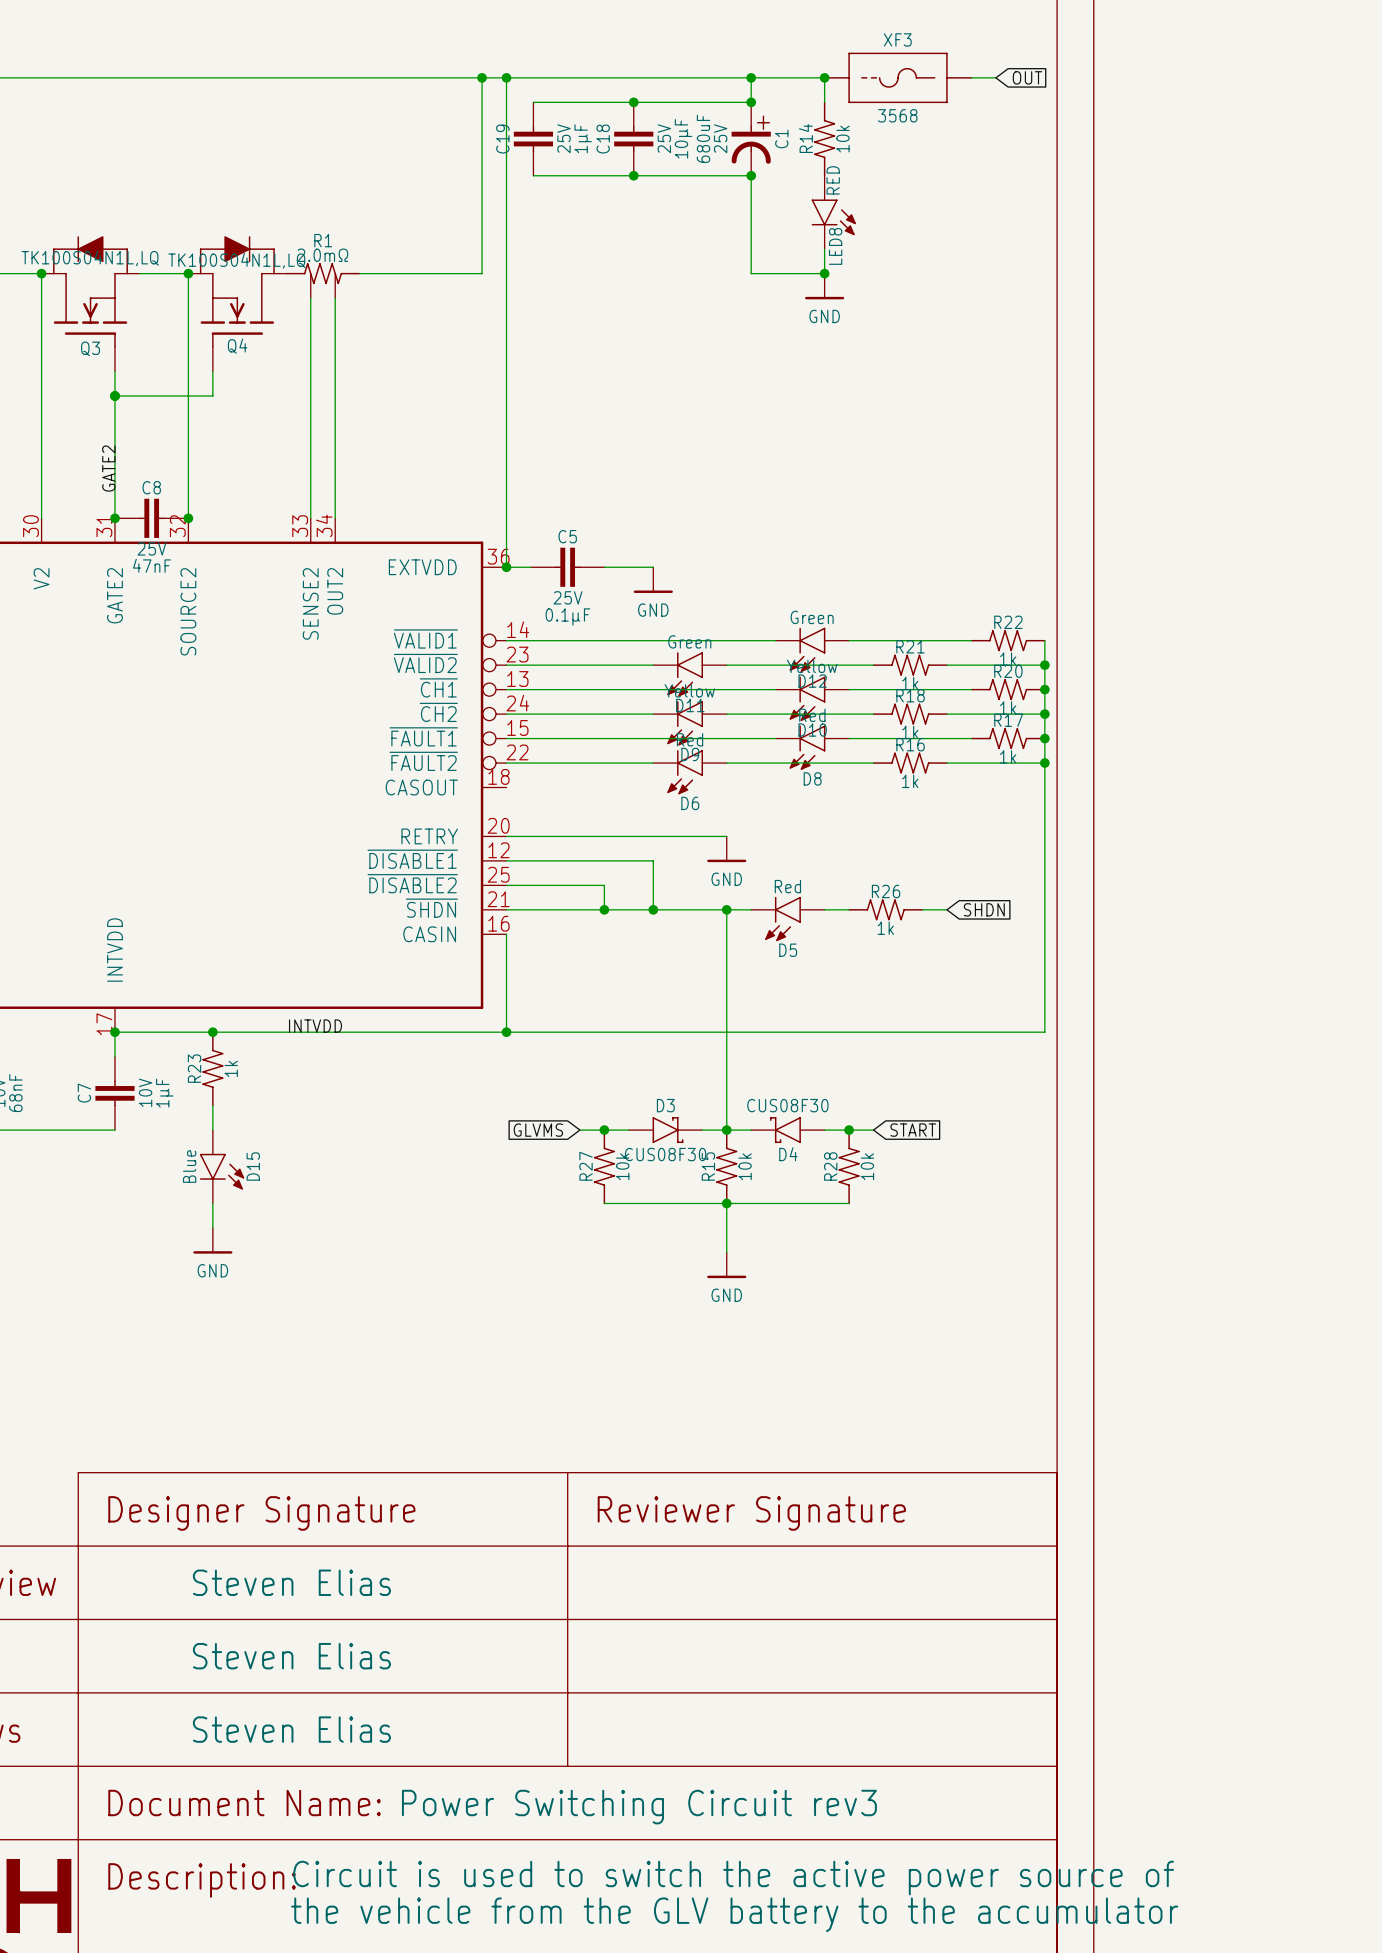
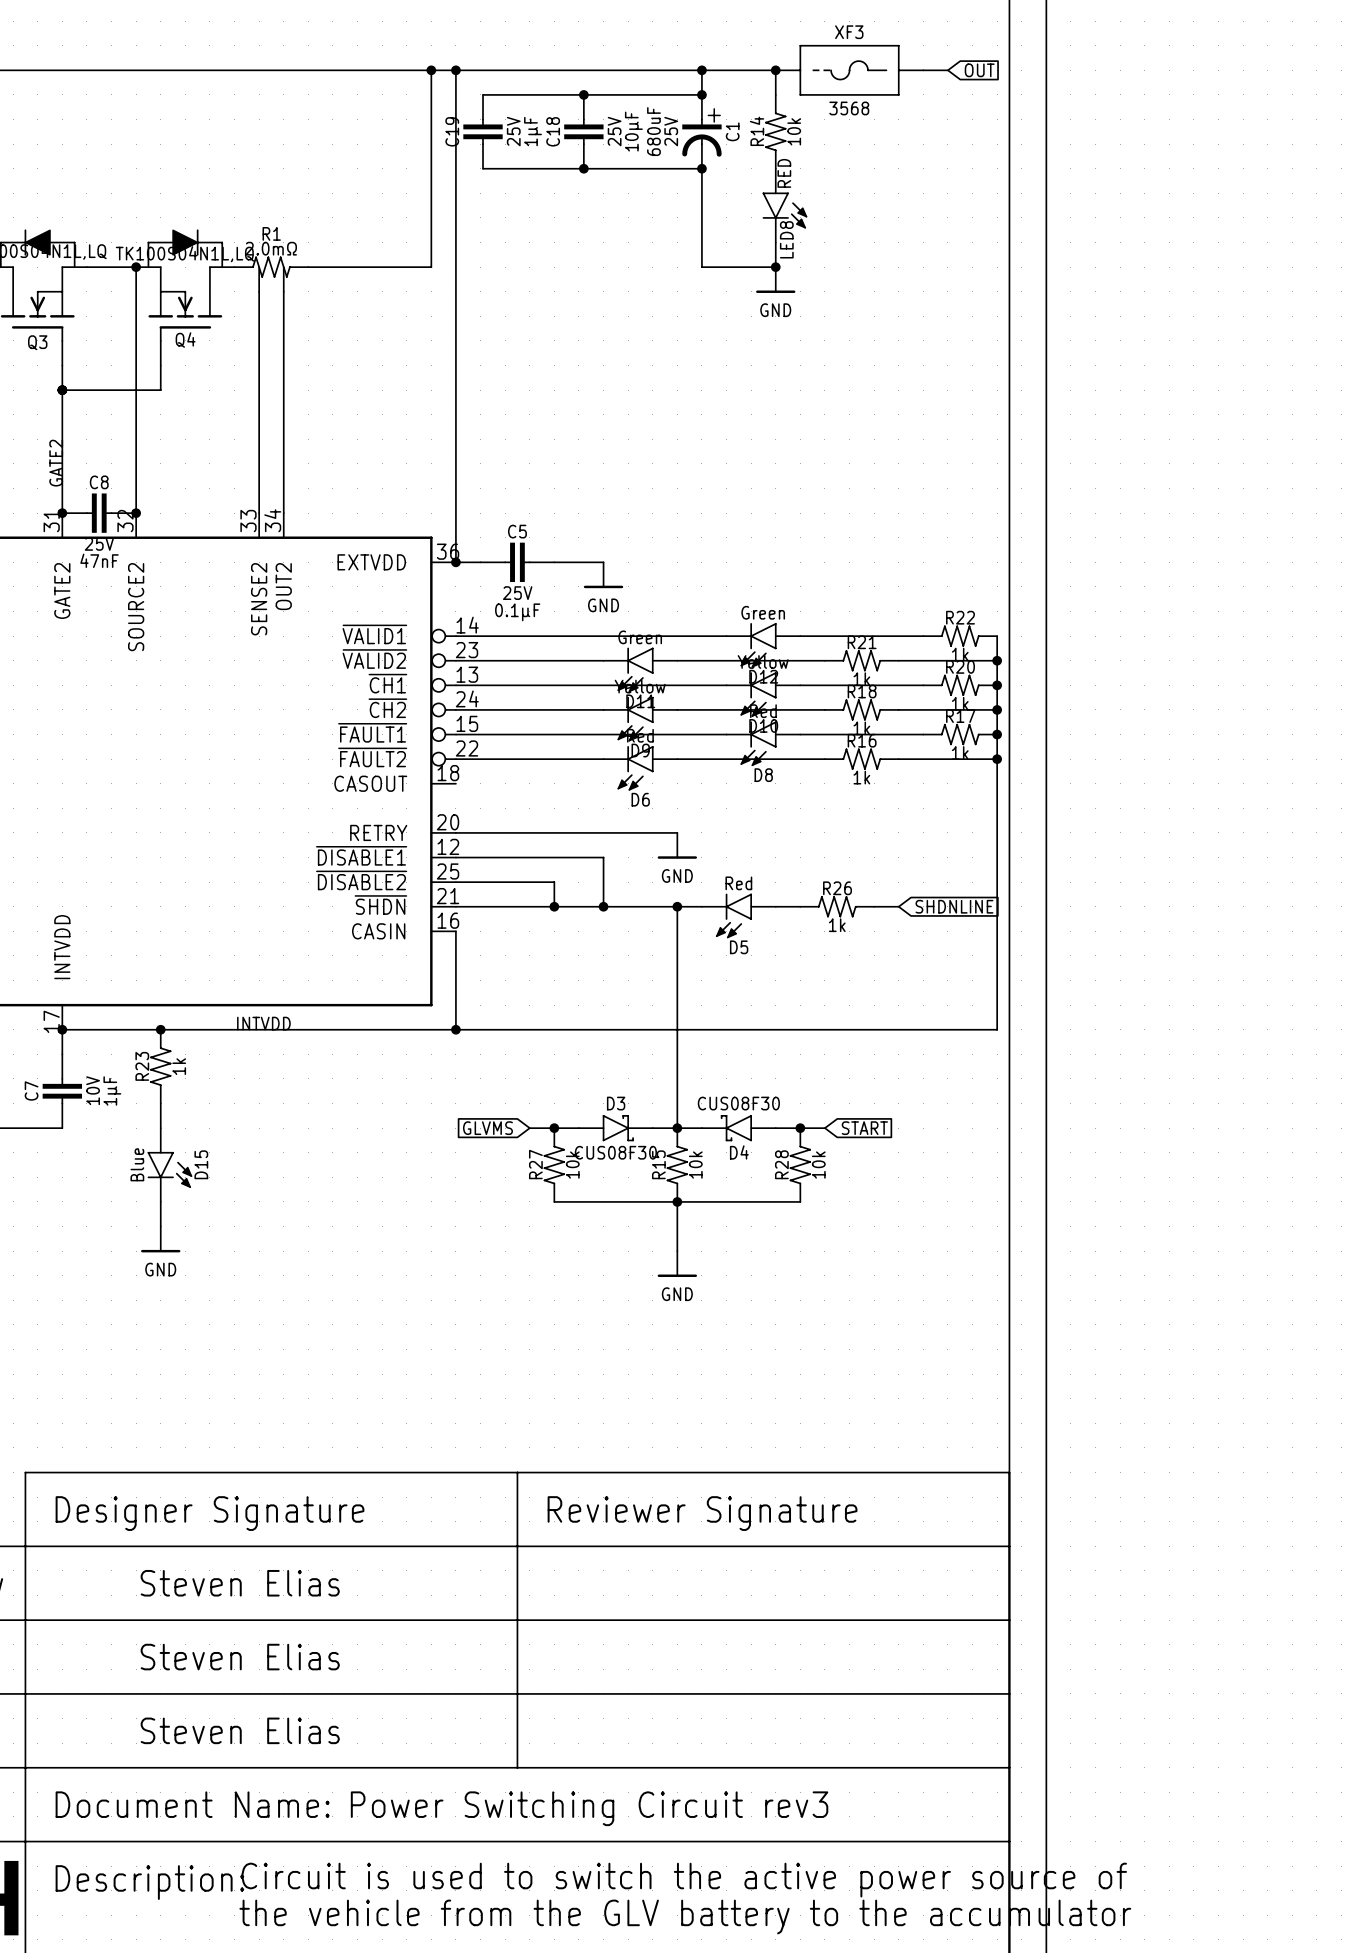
global label: SHDN (984, 909) -> SHDNLINE (954, 906)

